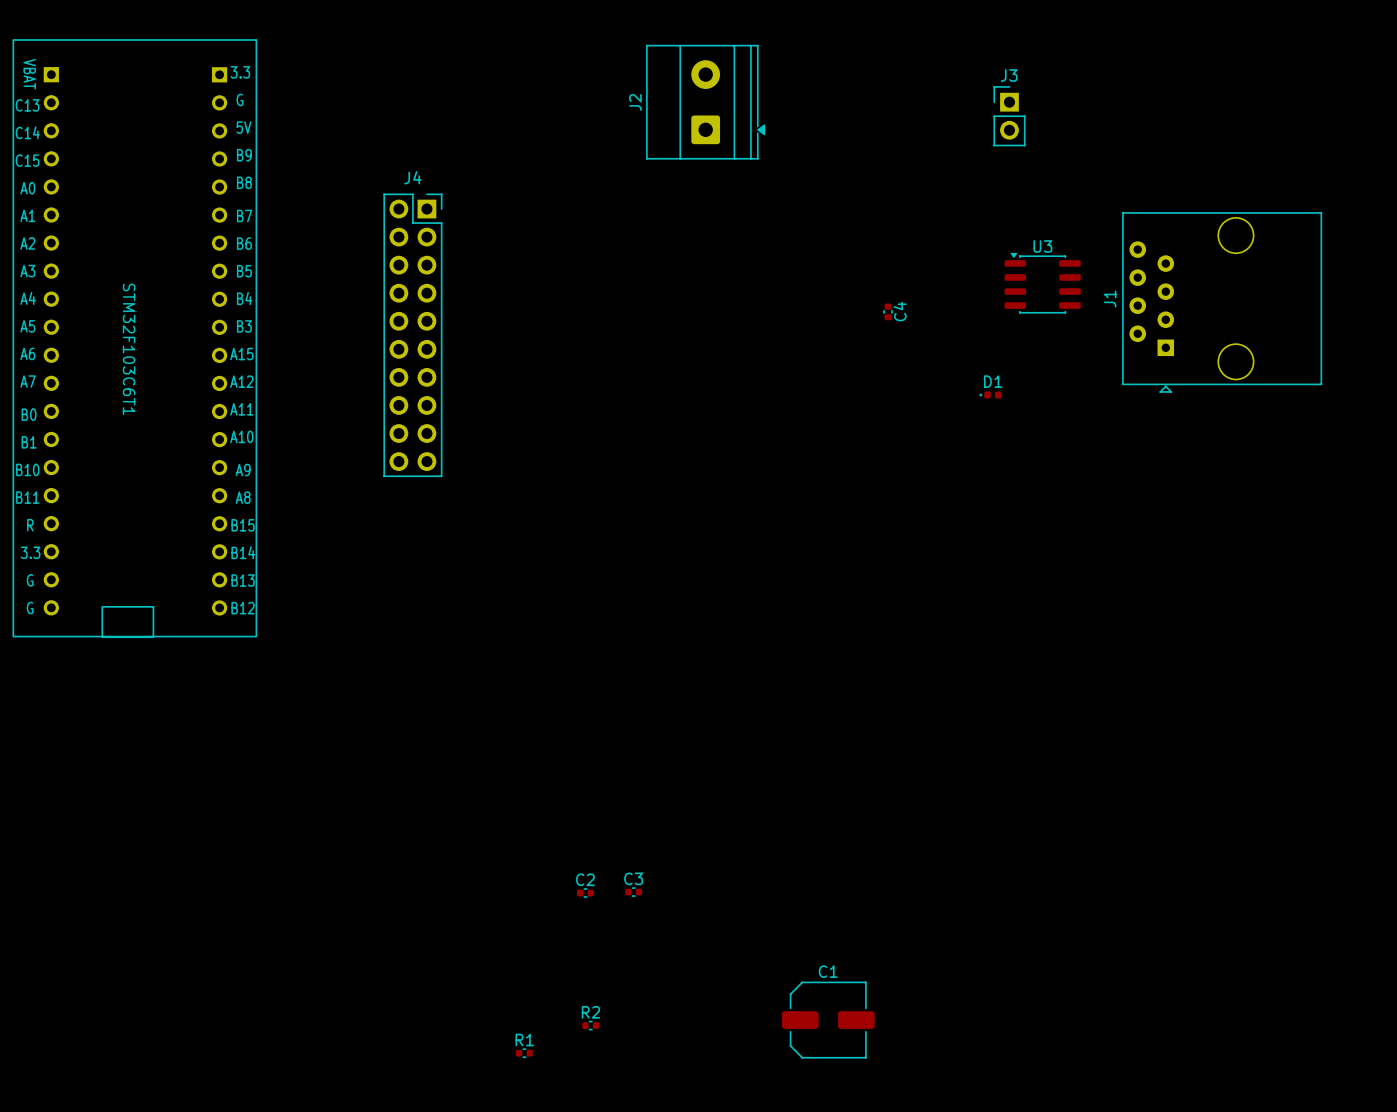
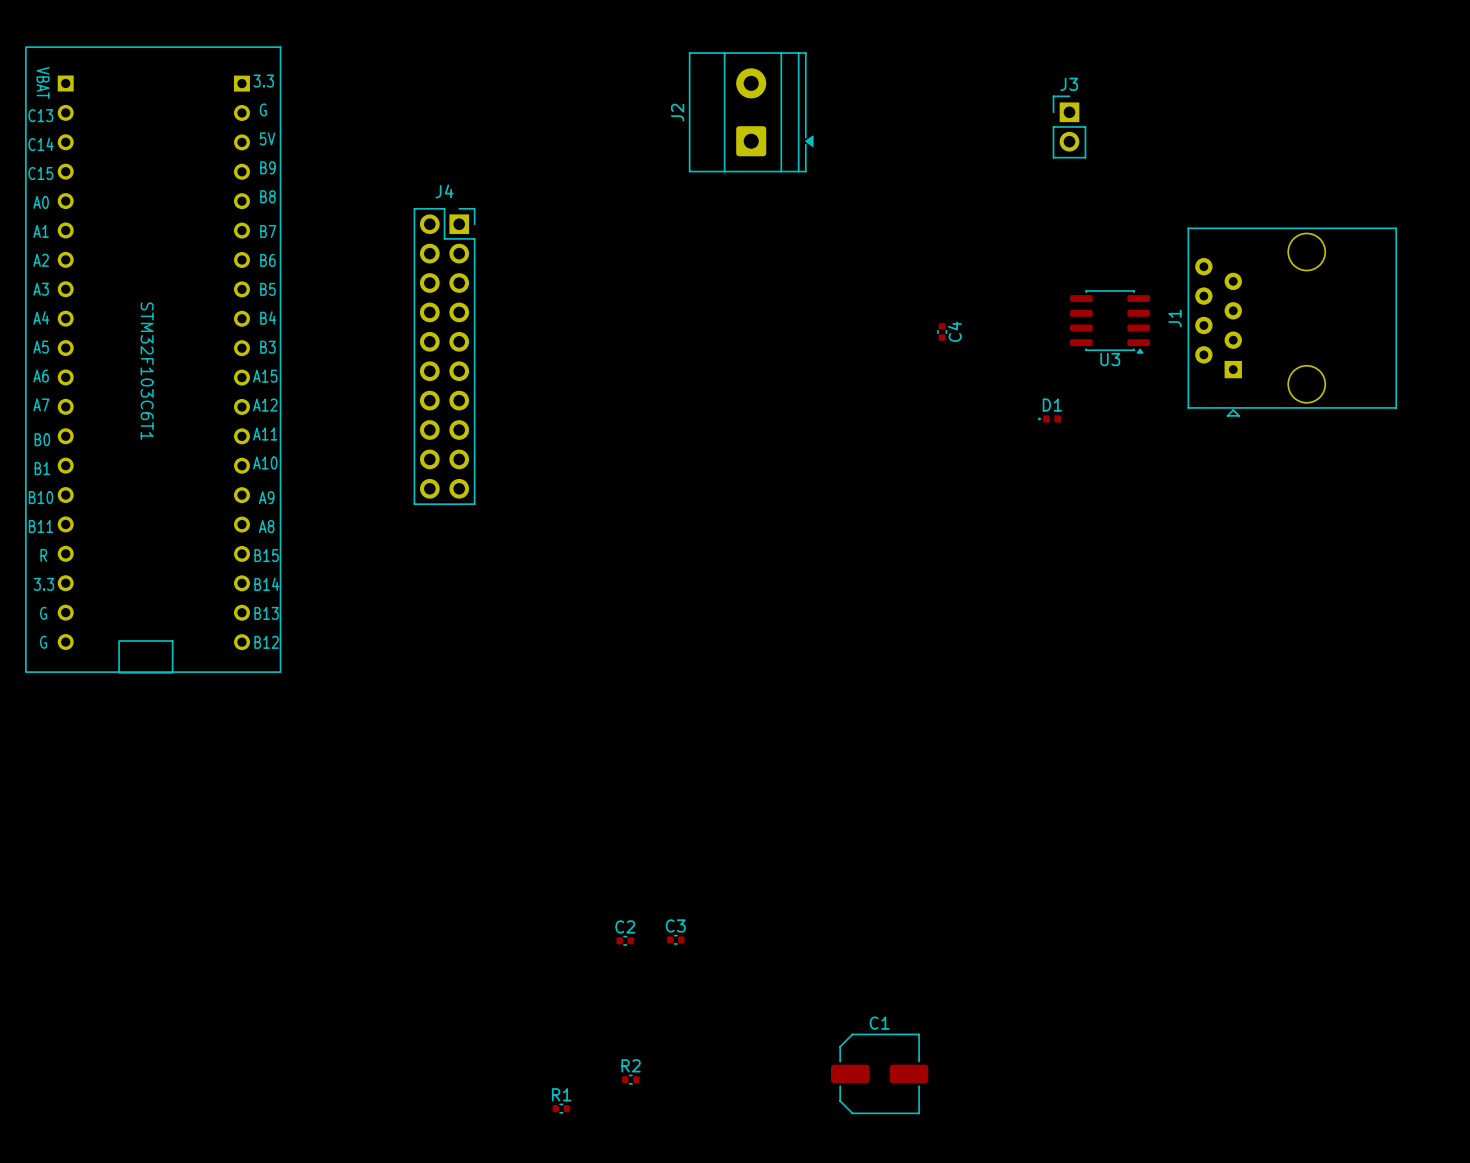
U3 rotation: 0° (1042, 283) -> 180° (1109, 322)

